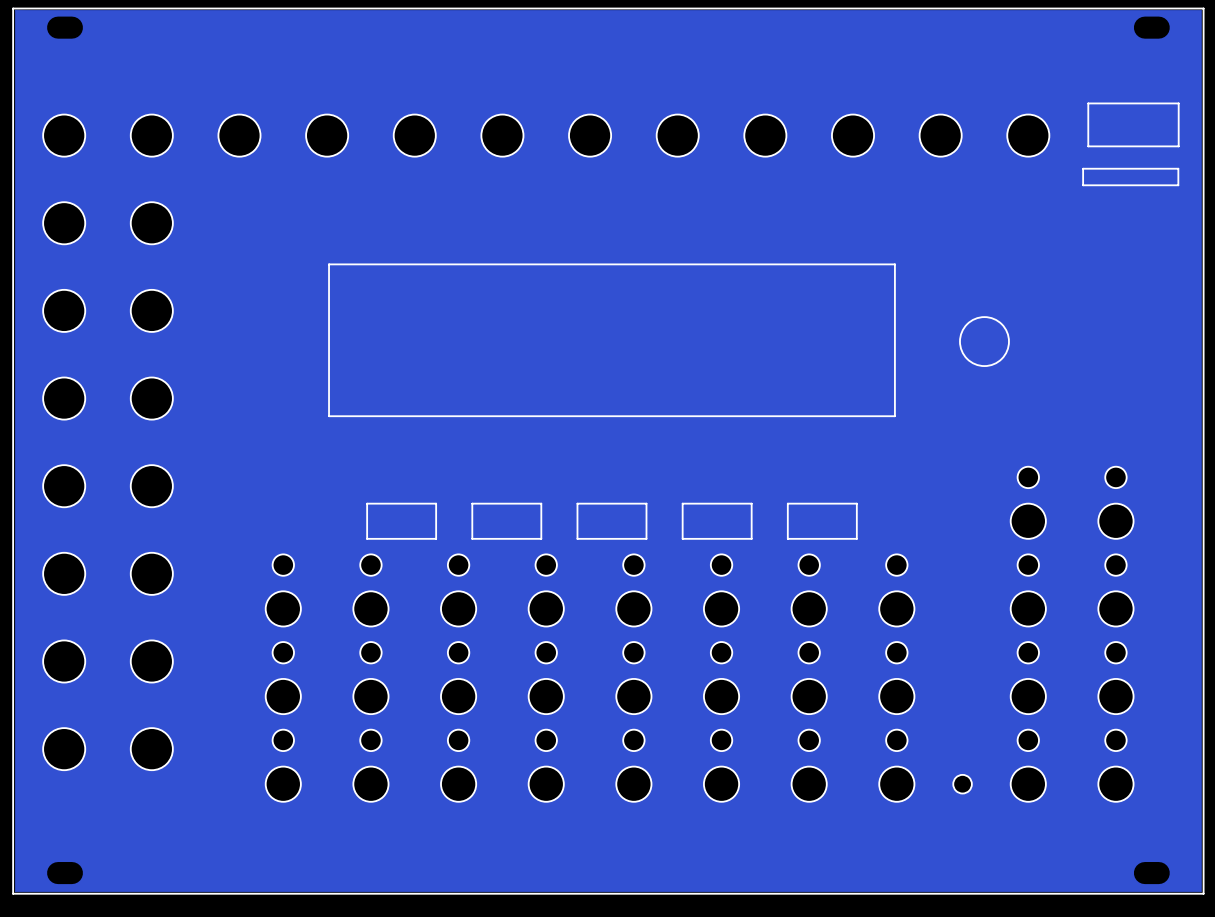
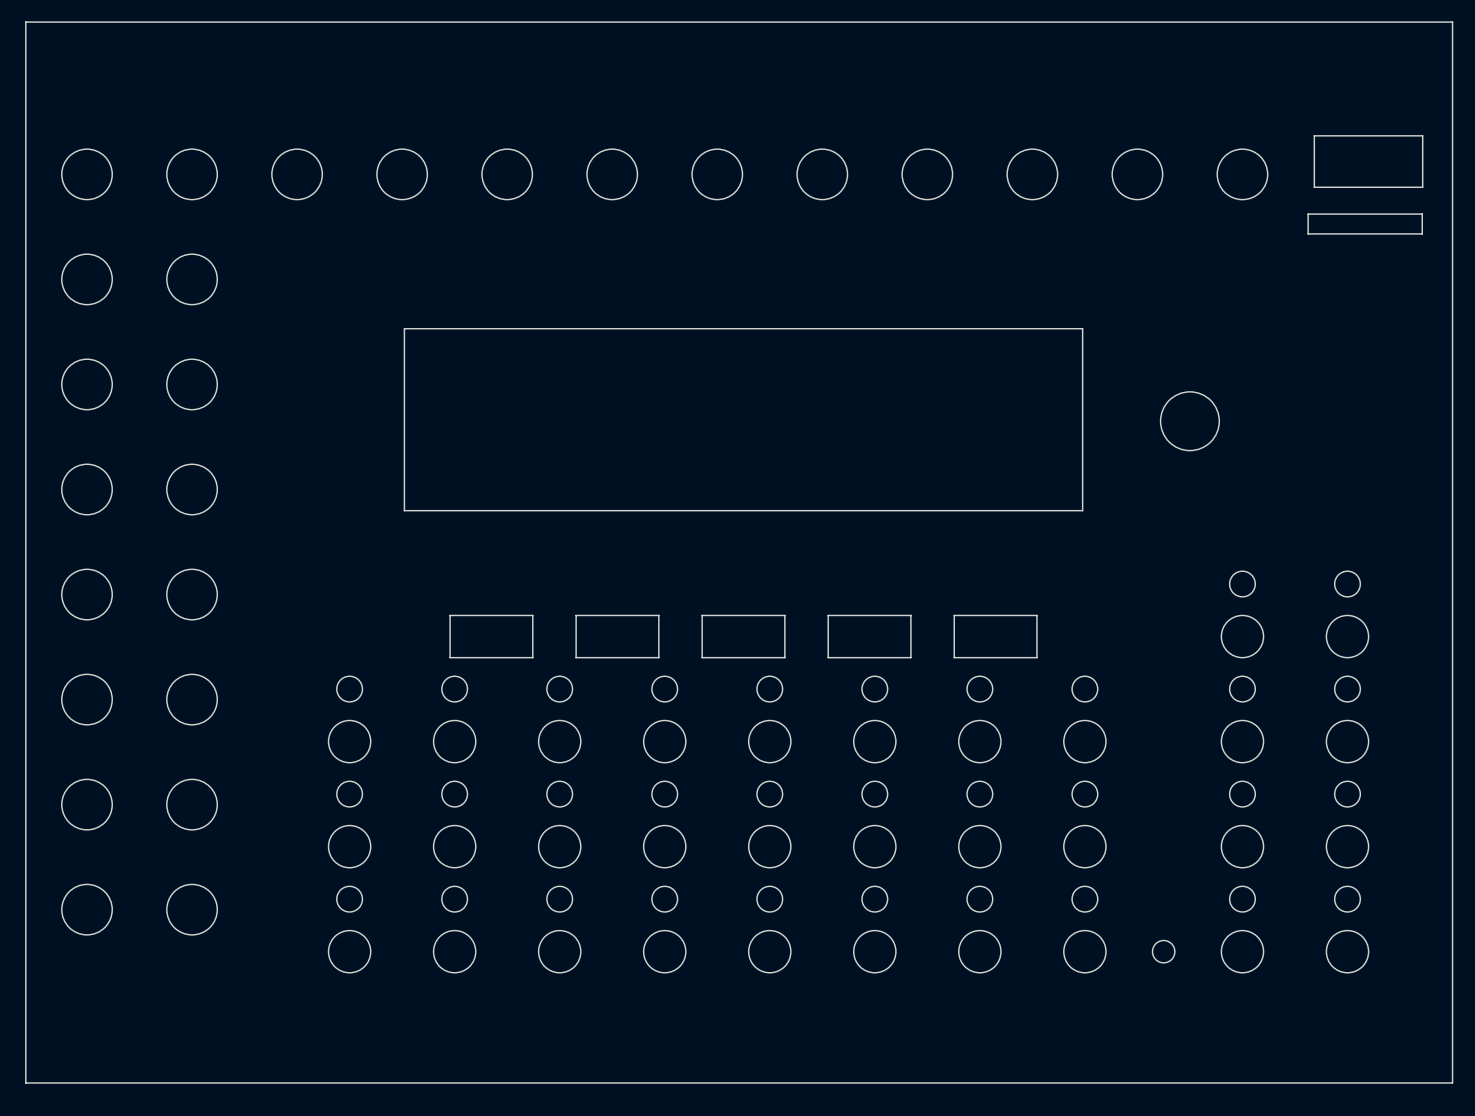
drawing: [14, 9, 1202, 893] -> none

